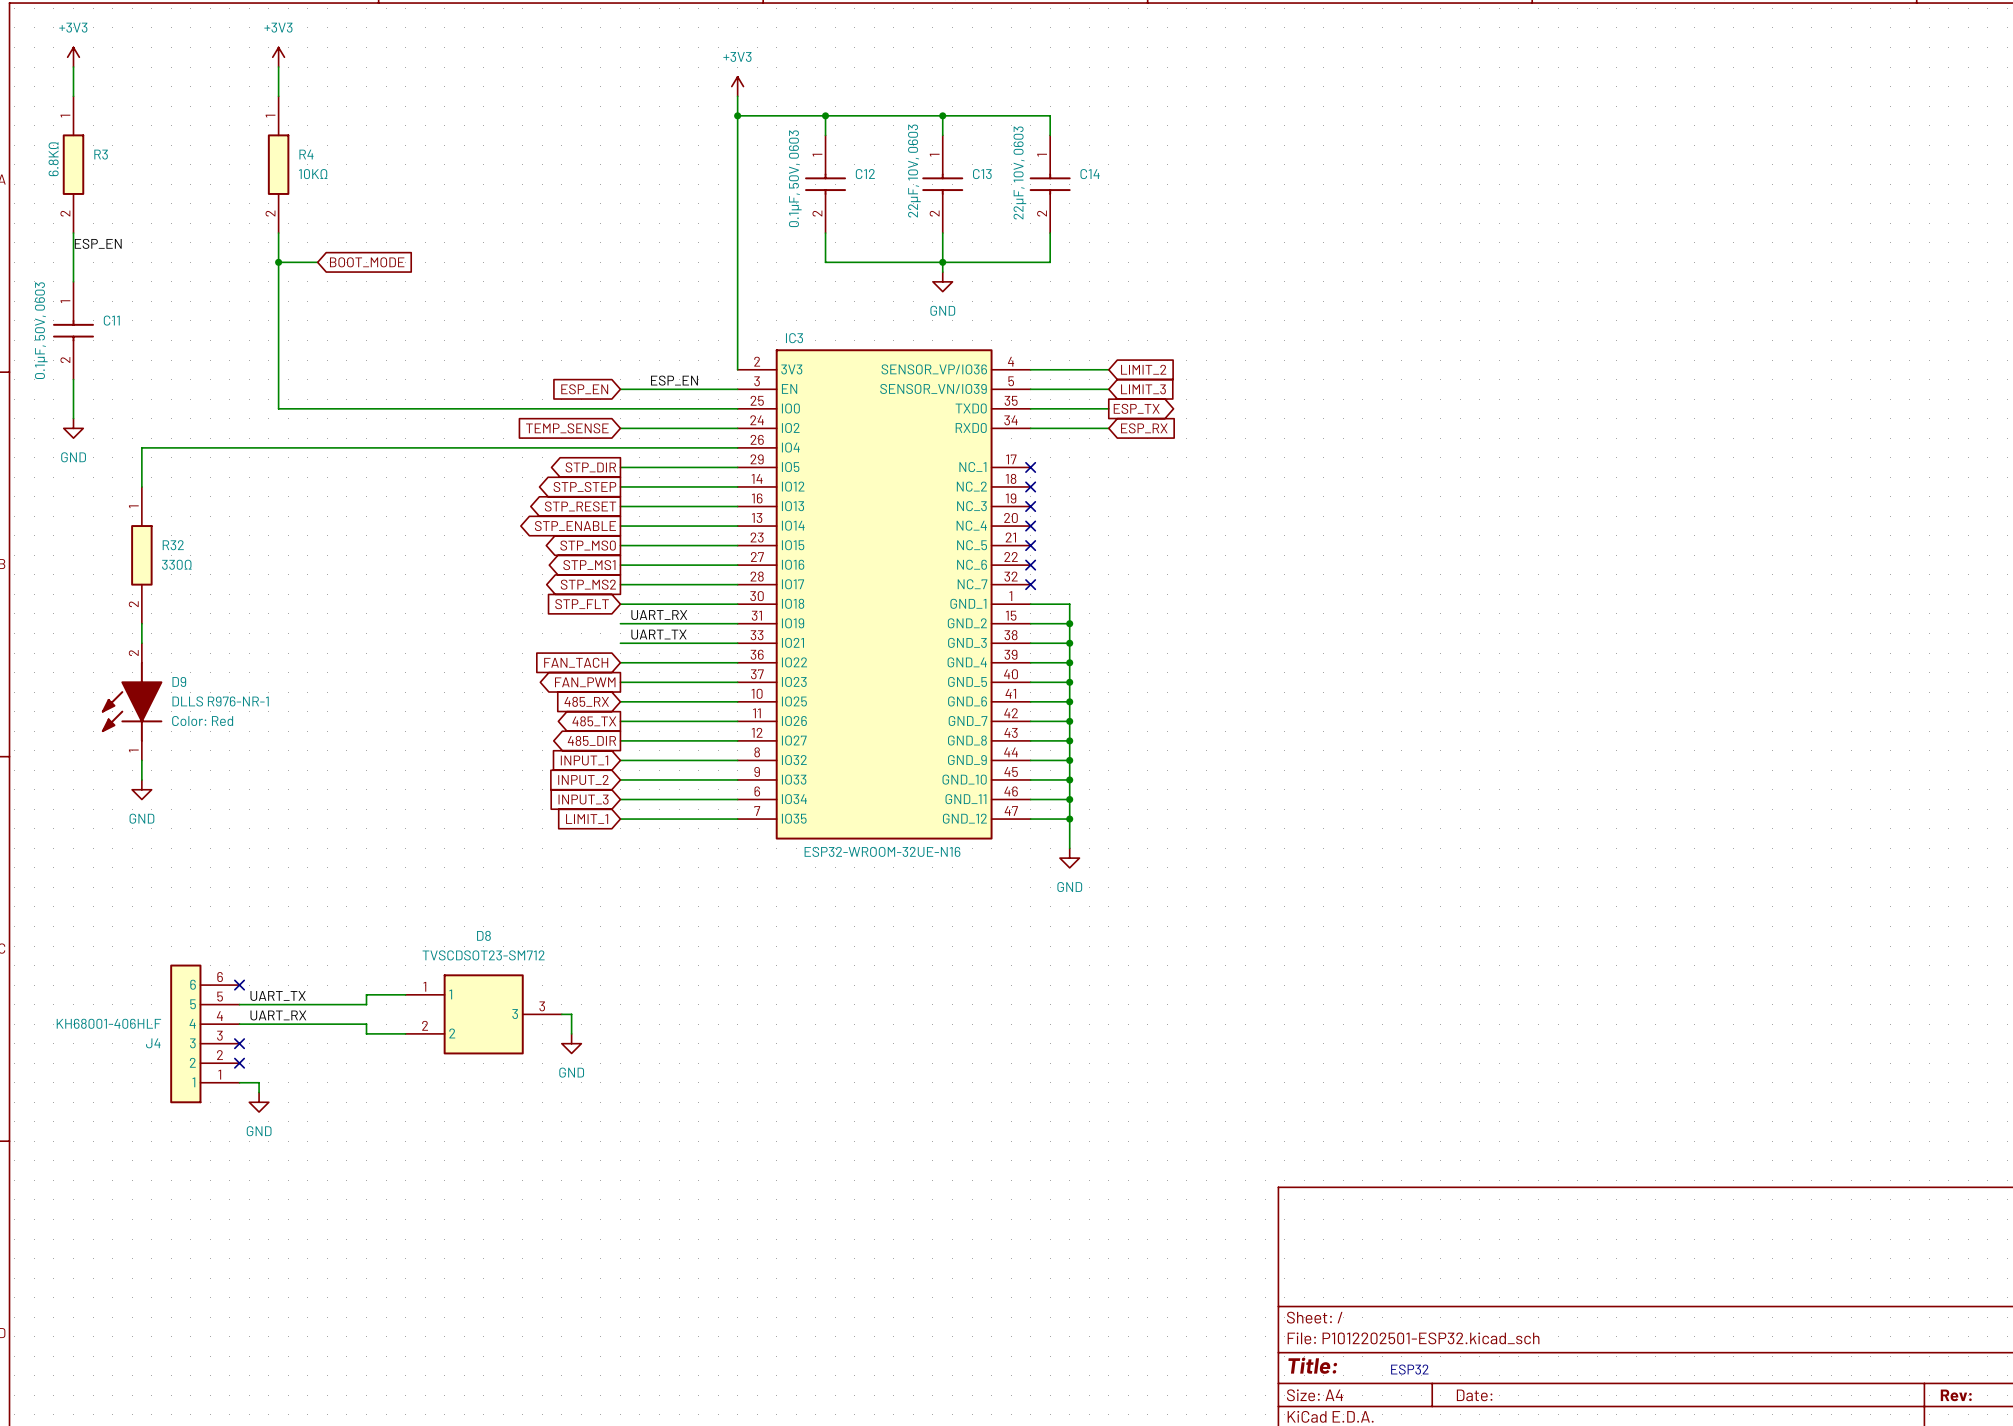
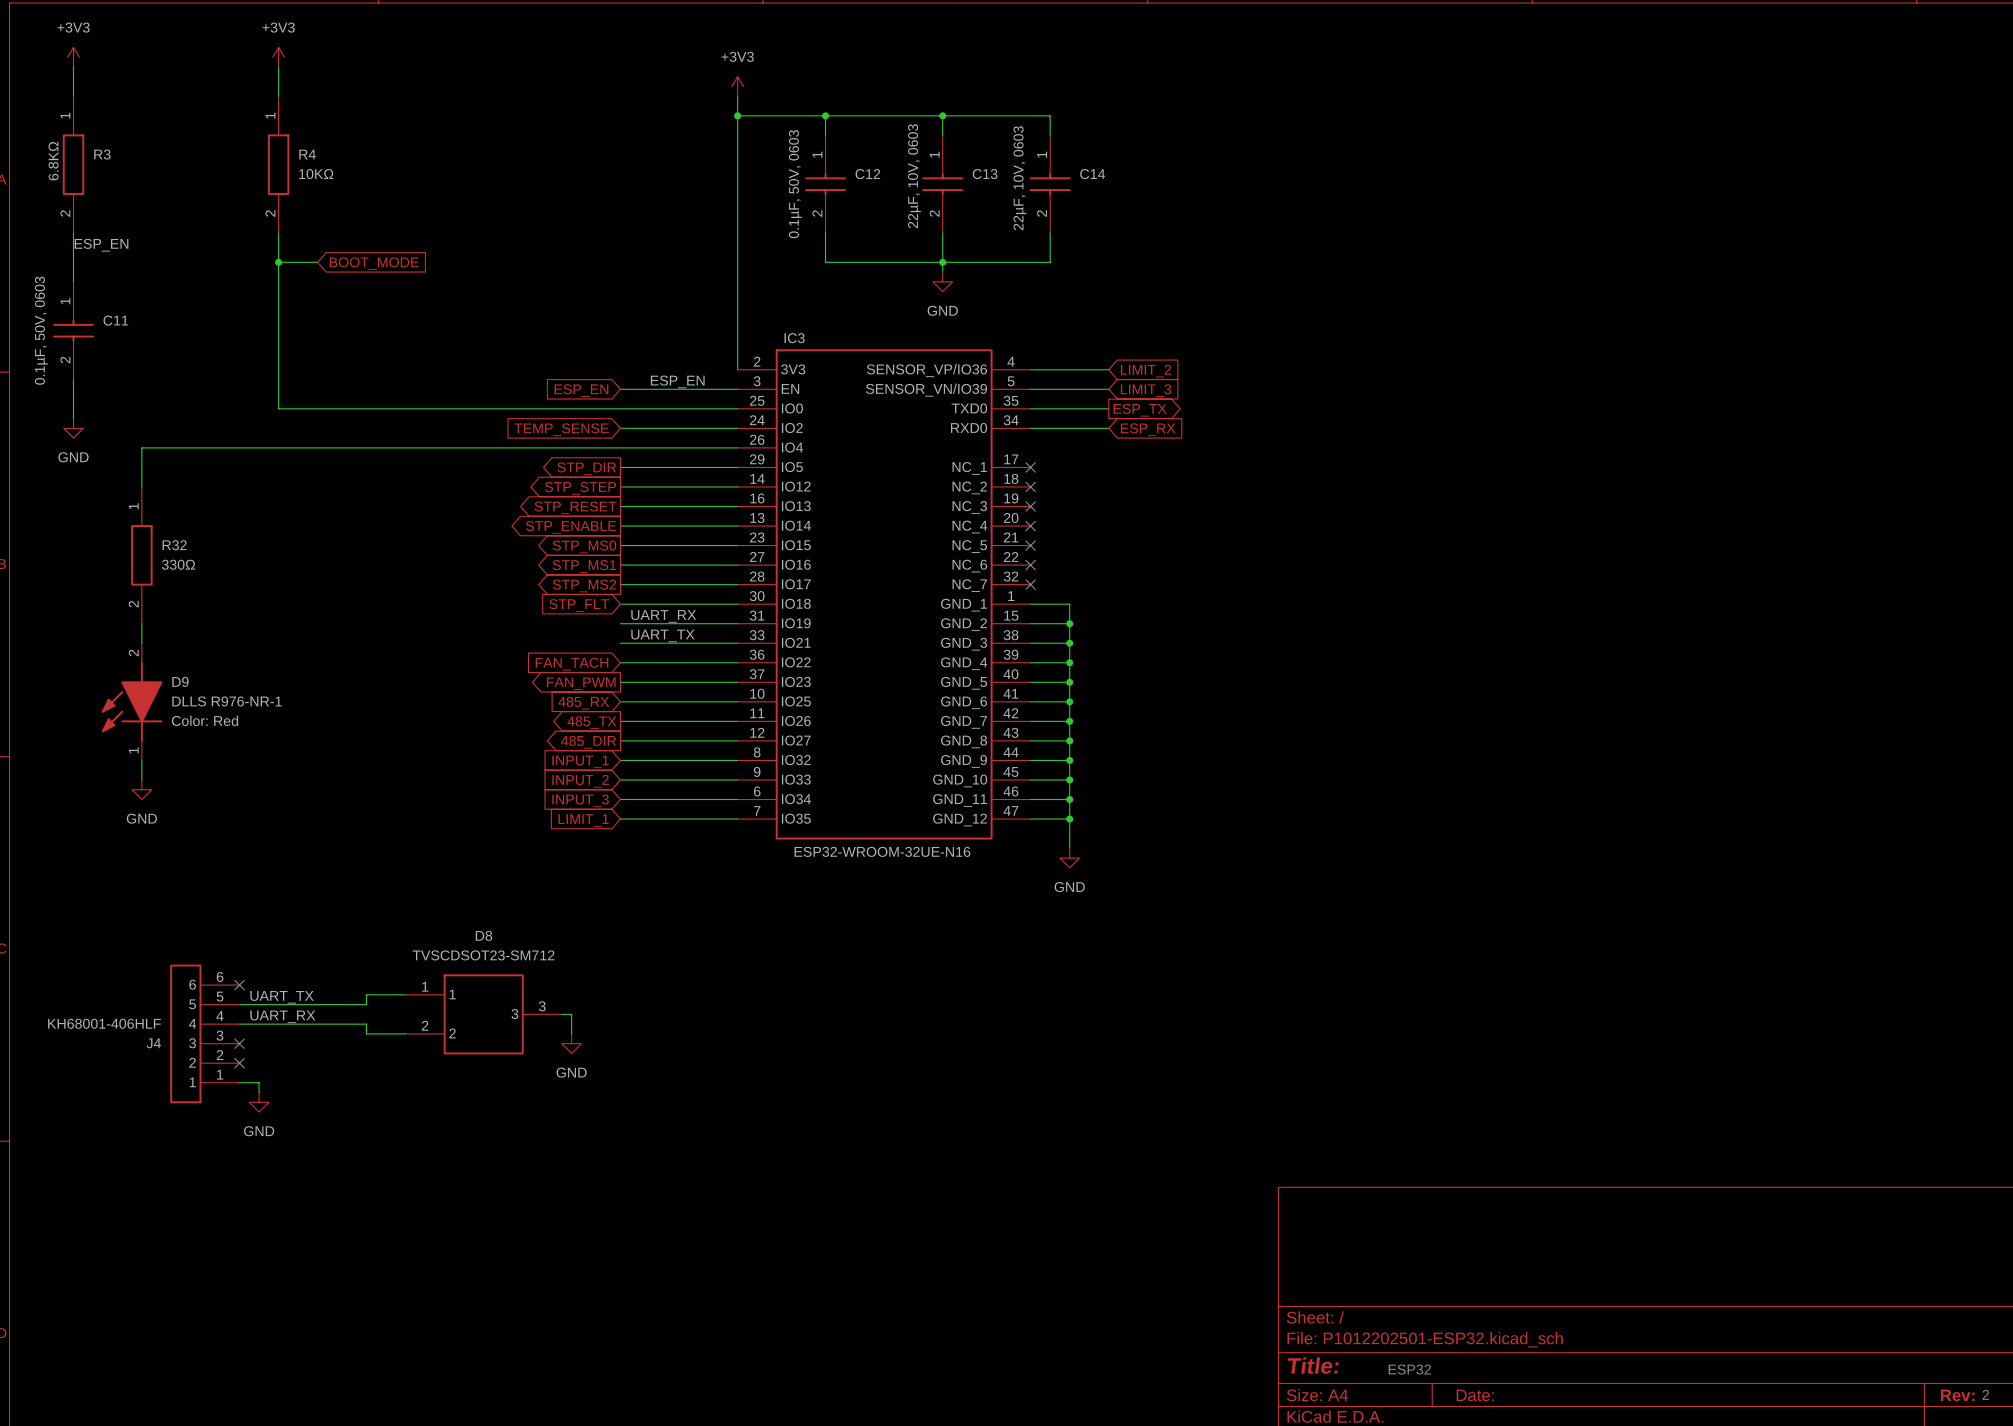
text: none -> 2 (1985, 1394)

